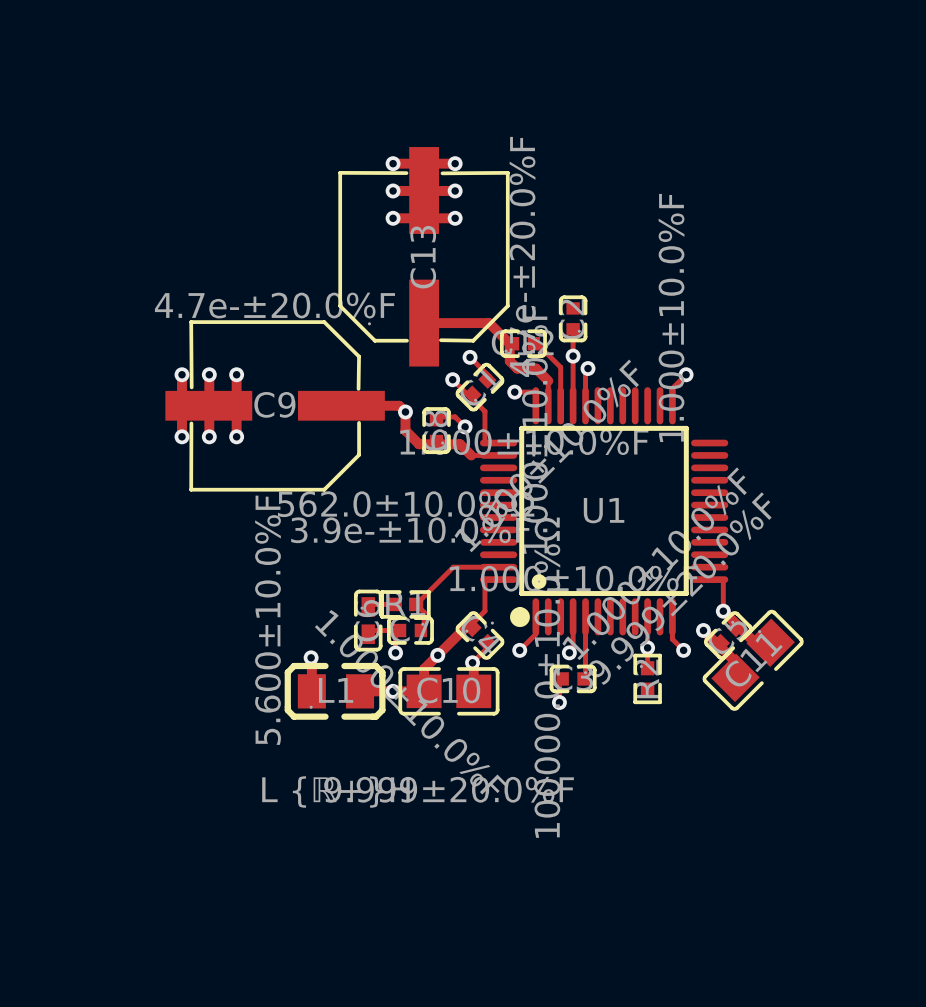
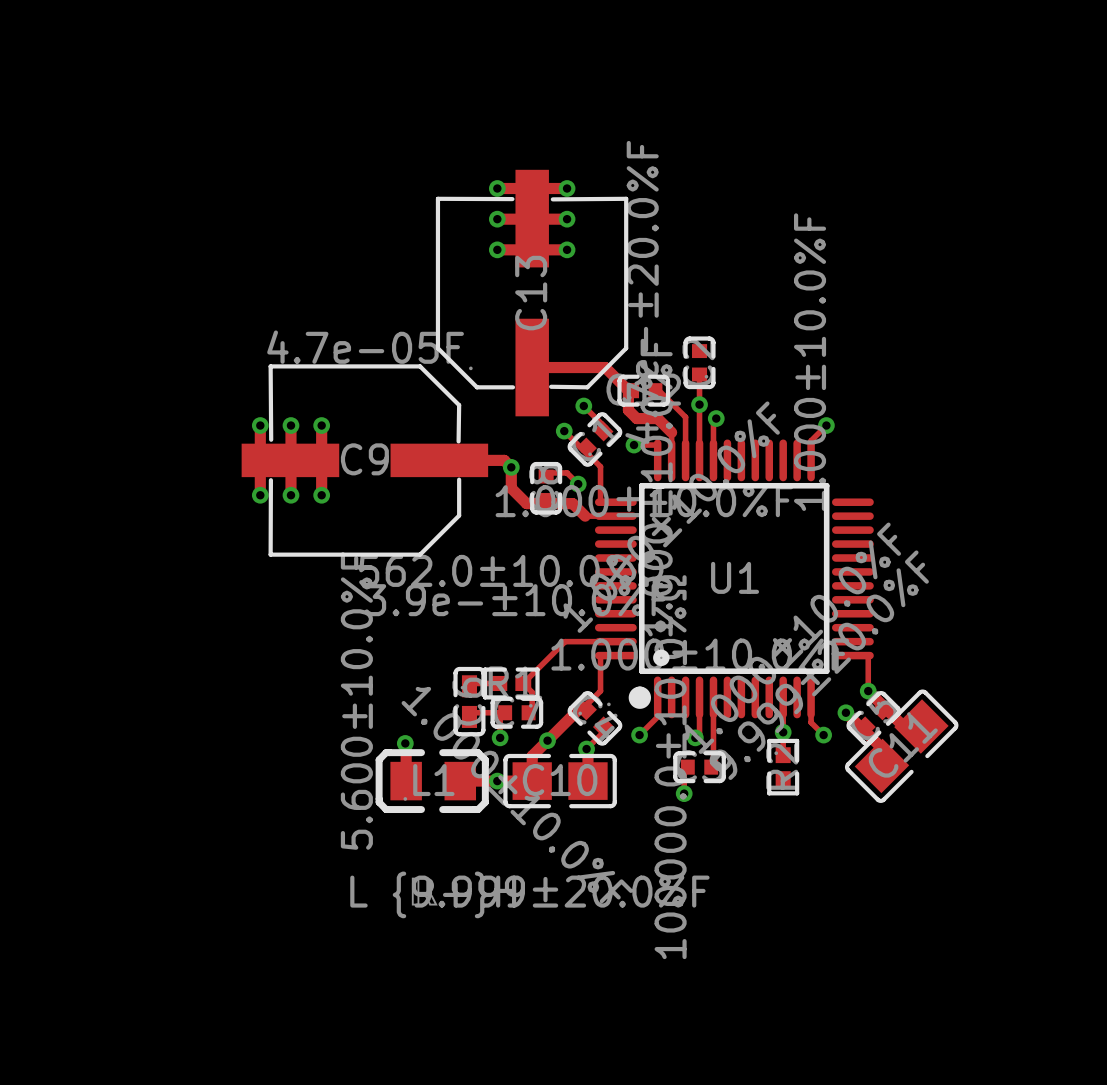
C9 value: 4.7e-±20.0%F (274, 305) -> 4.7e-05F (365, 347)

